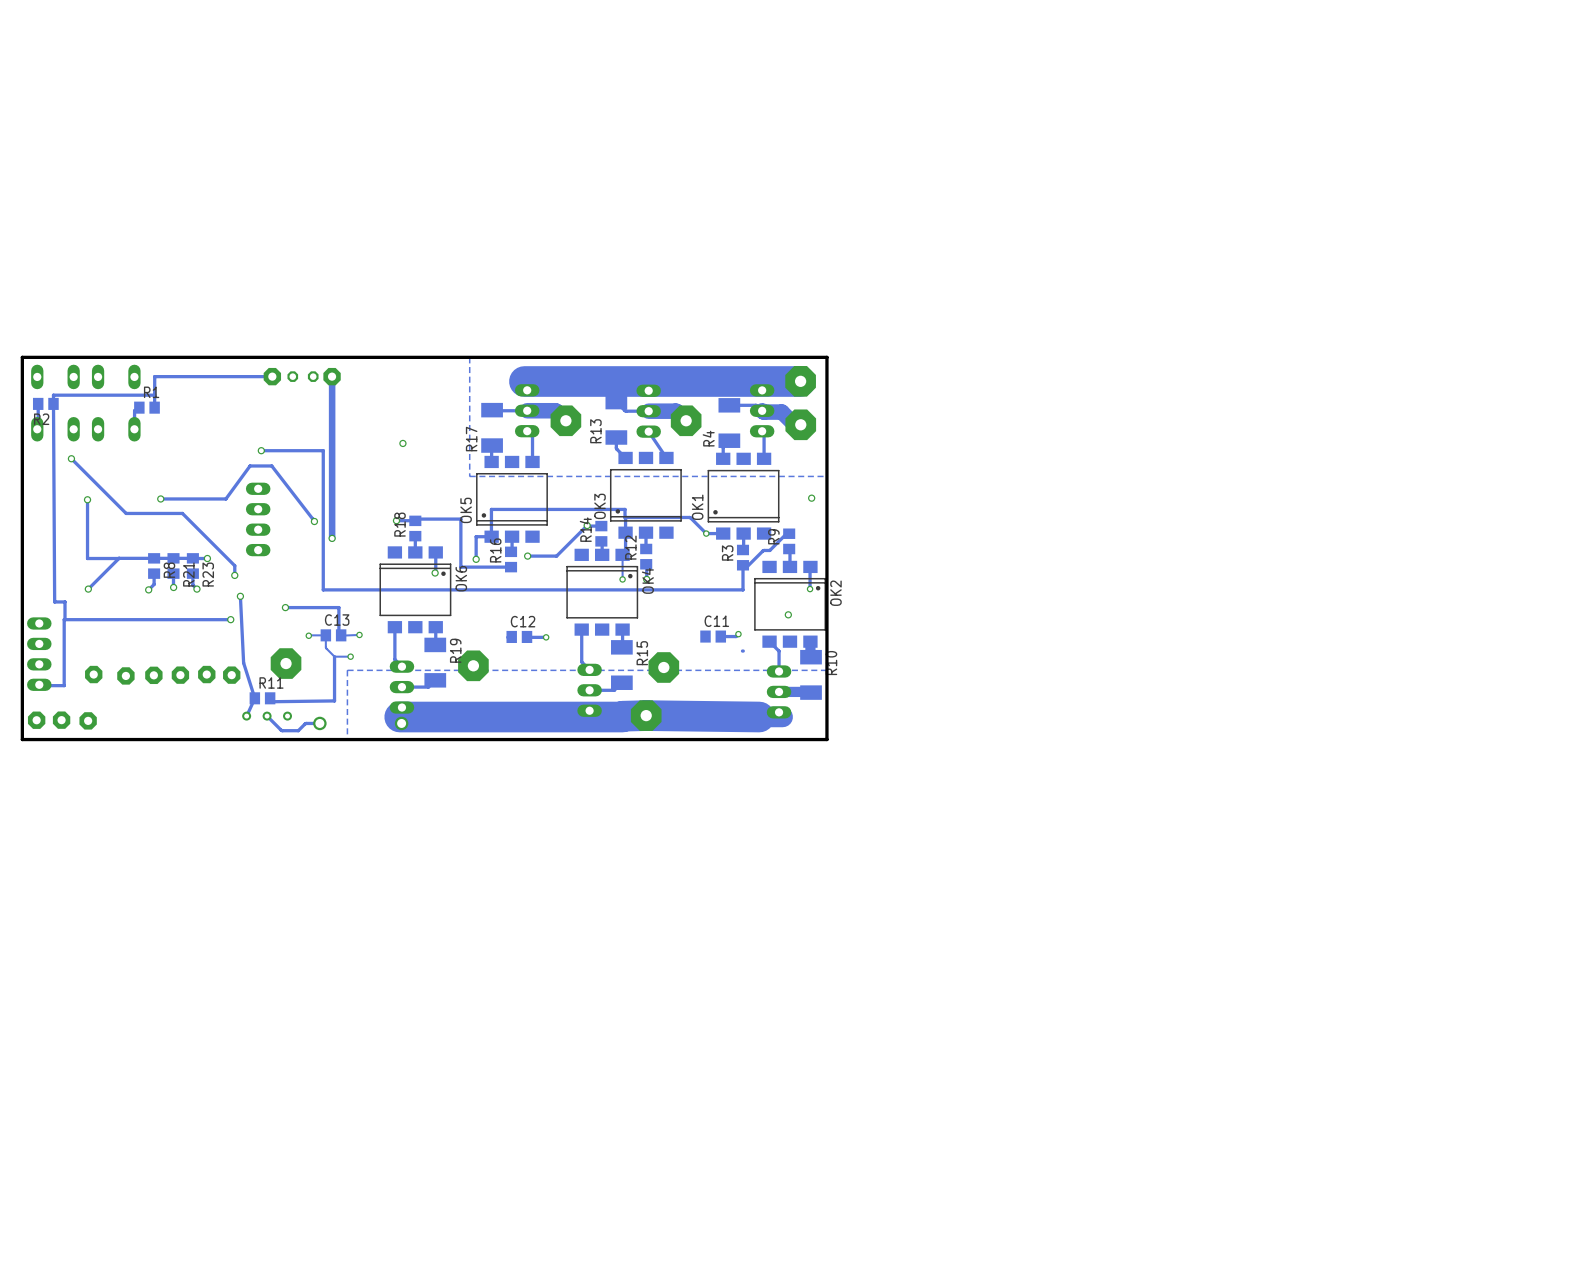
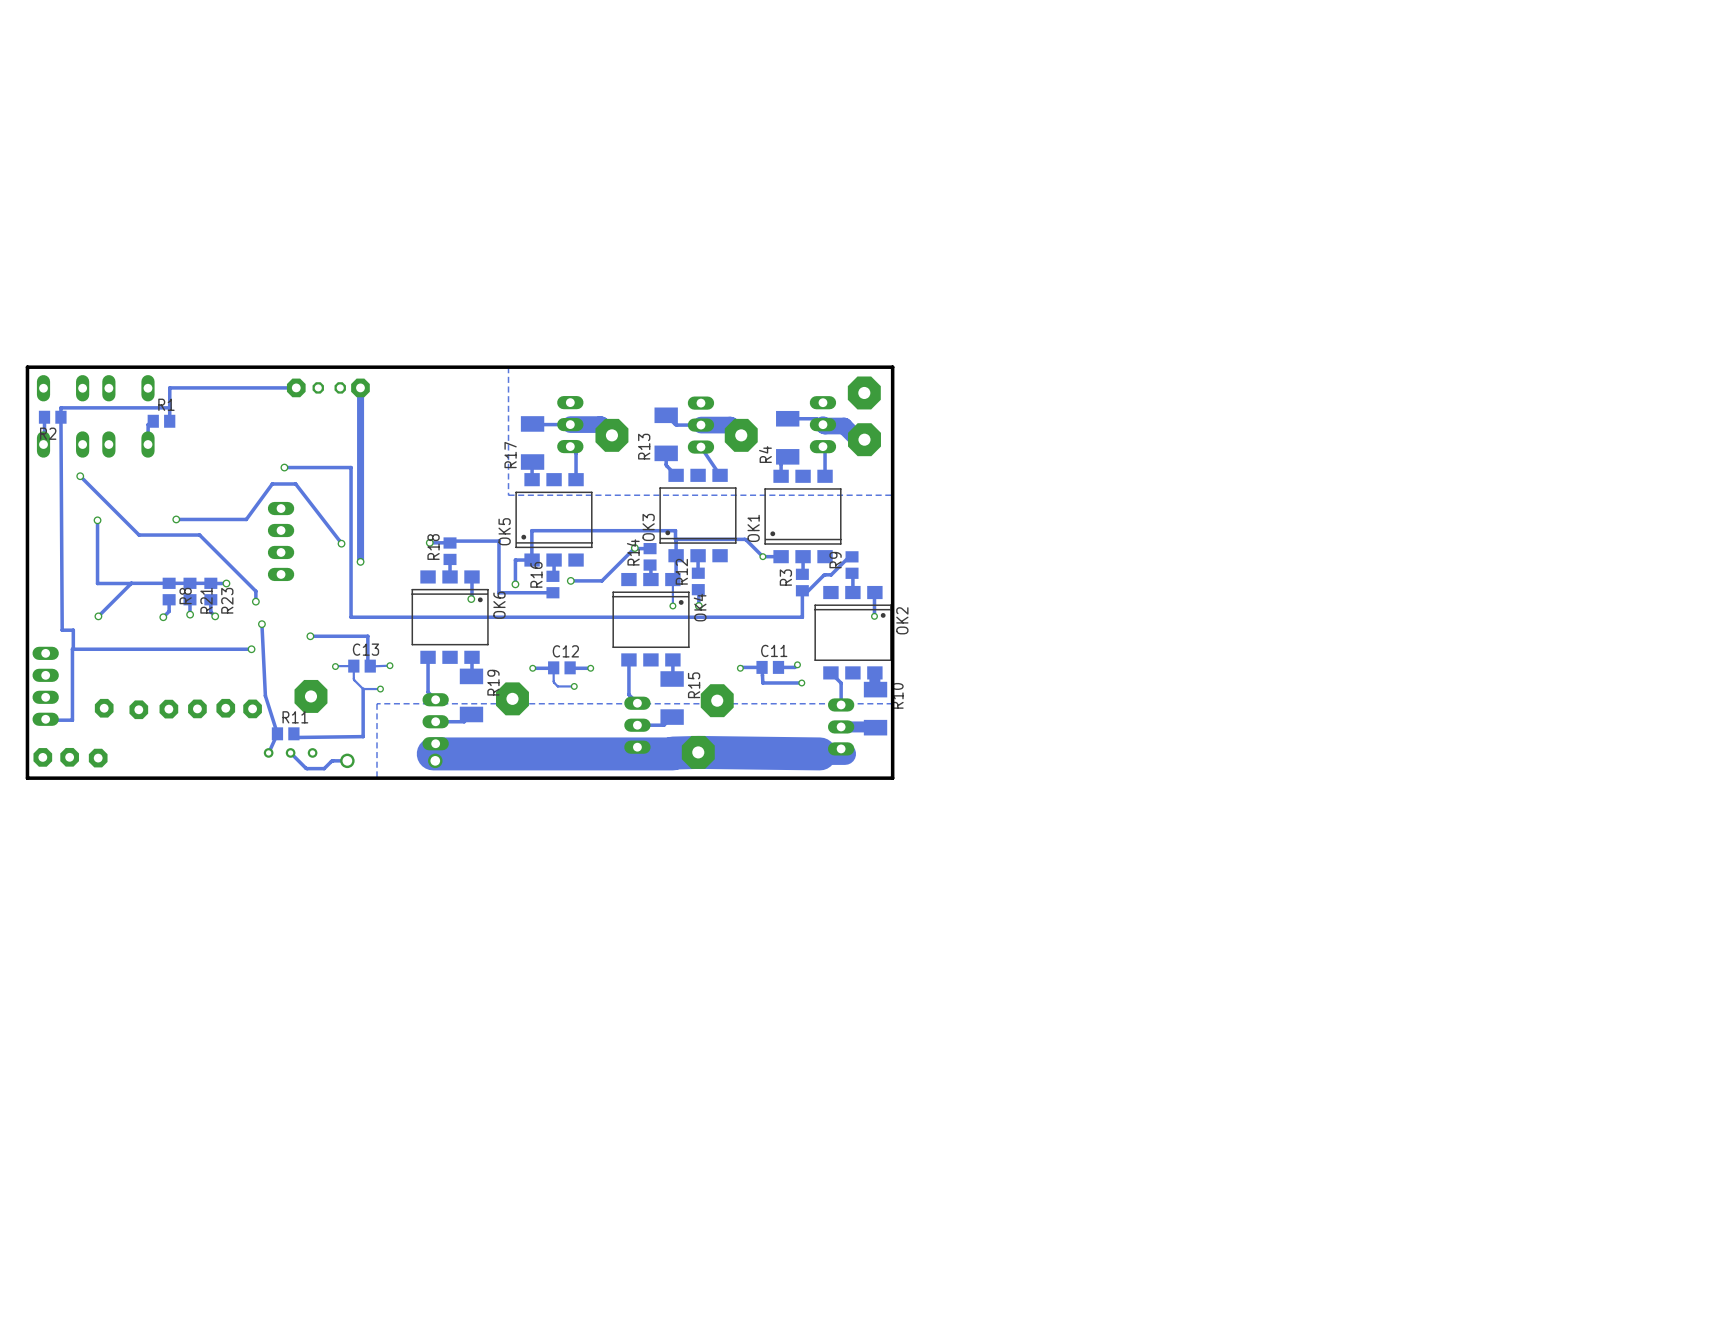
track: (800, 381) (524, 381) -> none
via: (402, 443) -> none
via: (811, 498) -> none
via: (788, 614) -> none
track: none -> (553, 667) (553, 681) (557, 686) (574, 686)
via: none -> (532, 668)
track: none -> (549, 668) (532, 668)
track: none -> (740, 668) (762, 667) (762, 682) (801, 682)
via: none -> (740, 668)
via: none -> (801, 682)
via: none -> (574, 686)

